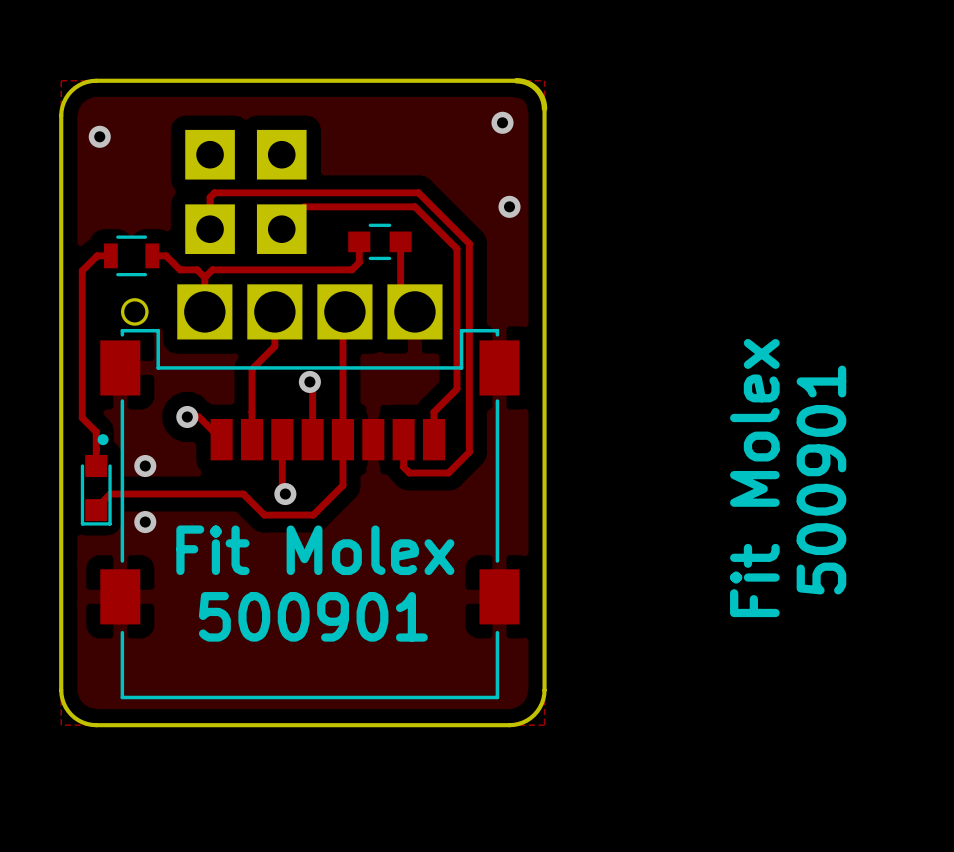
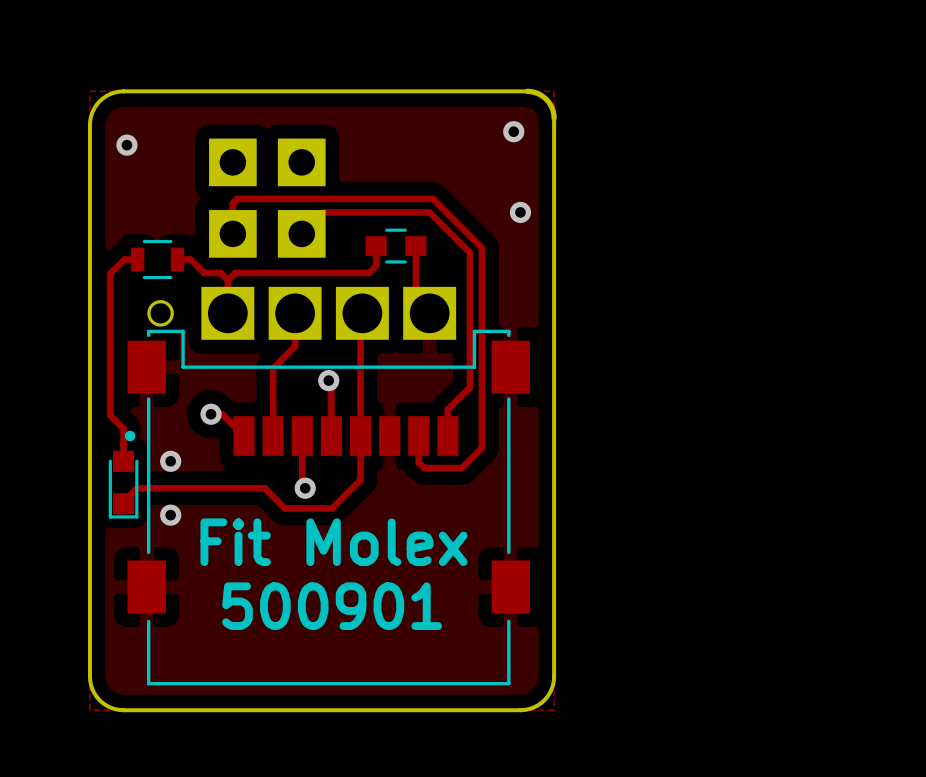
text: Fit Molex (754, 478) -> none
text: 500901 (821, 480) -> none

